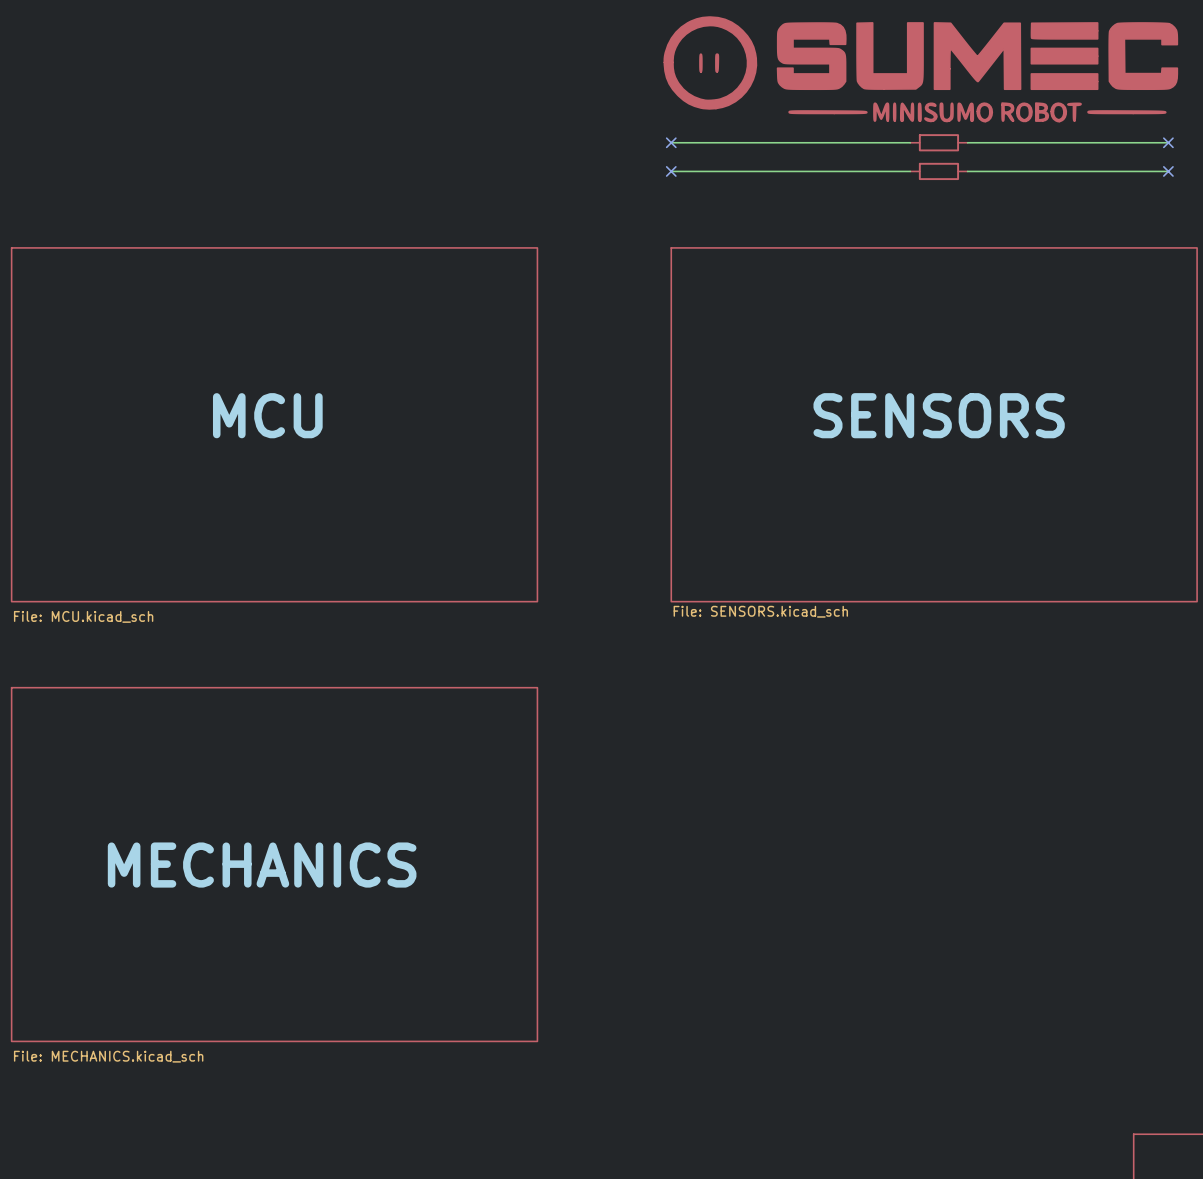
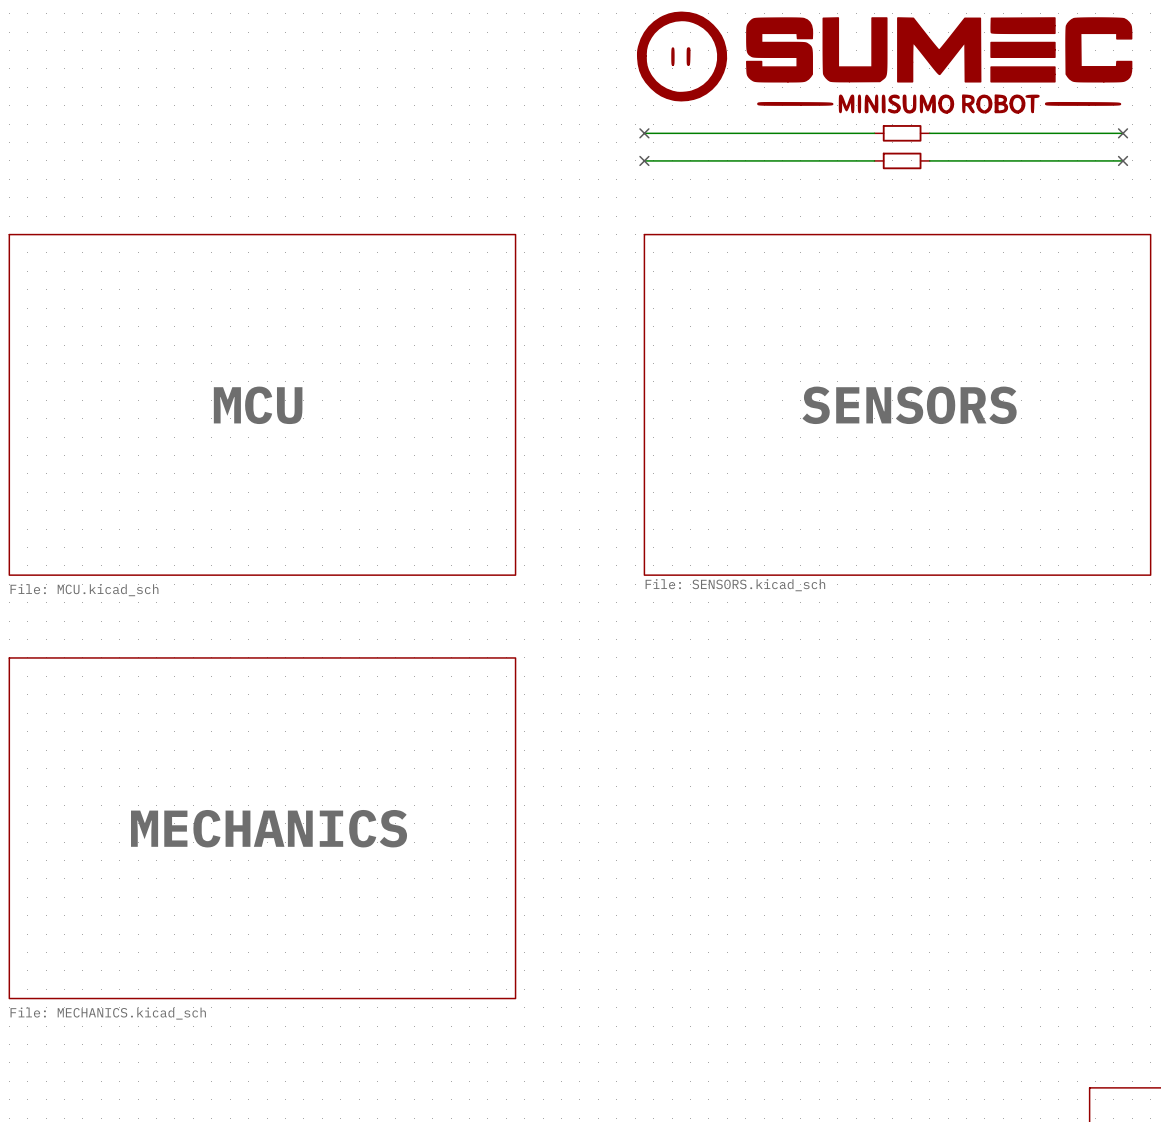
sheet MCU name position: MCU (267, 415) -> MCU (258, 405)
sheet SENSORS name position: SENSORS (939, 415) -> SENSORS (909, 405)
sheet MECHANICS name position: MECHANICS (262, 865) -> MECHANICS (269, 828)

